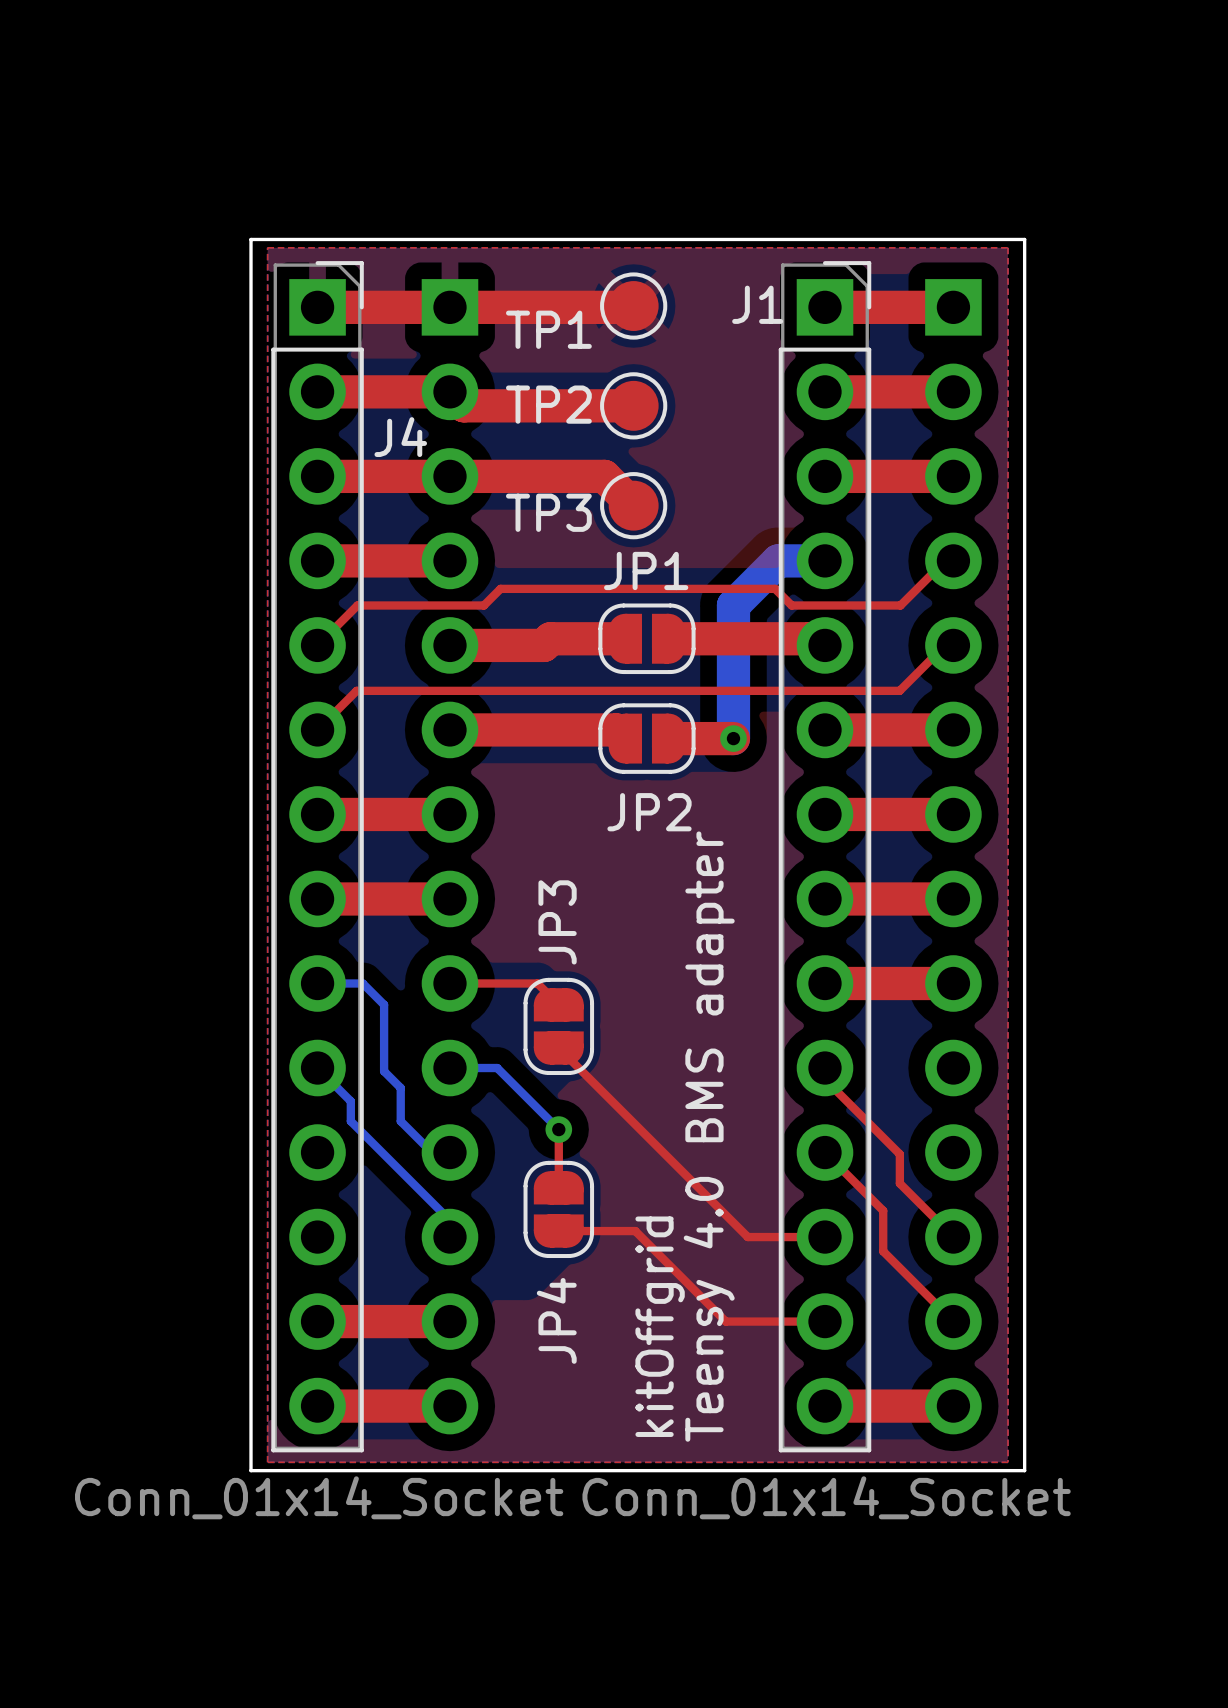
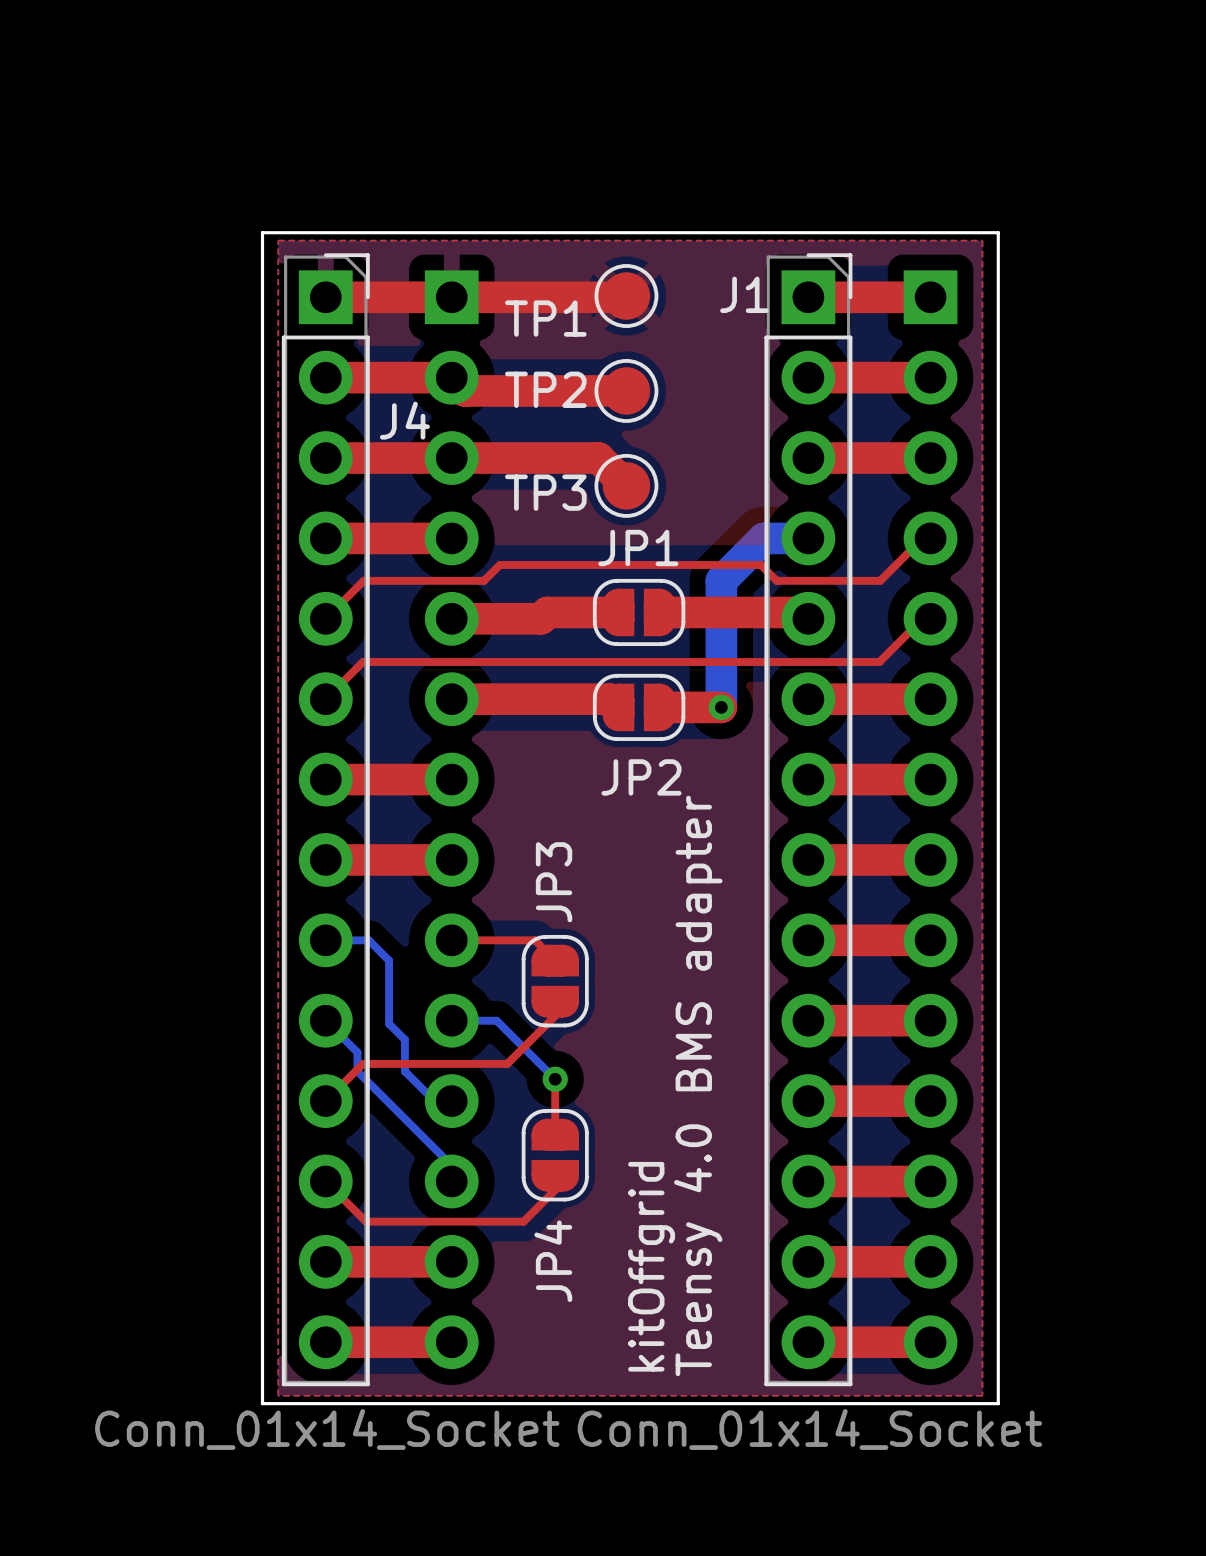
top track: (558, 1048) (747, 1237) (816, 1237) -> (555, 1001) (555, 1015) (507, 1063) (362, 1063) (325, 1101)
top track: none -> (800, 1020) (922, 1020)
top track: (824, 1068) (824, 1079) (899, 1154) (899, 1183) (953, 1237) -> none
top track: none -> (800, 1101) (922, 1101)
top track: (824, 1152) (883, 1210) (883, 1251) (953, 1321) -> none
top track: (558, 1231) (635, 1231) (725, 1321) (816, 1321) -> (555, 1175) (555, 1190) (523, 1221) (365, 1221) (325, 1181)
top track: none -> (808, 1181) (922, 1181)
top track: none -> (808, 1261) (922, 1261)

